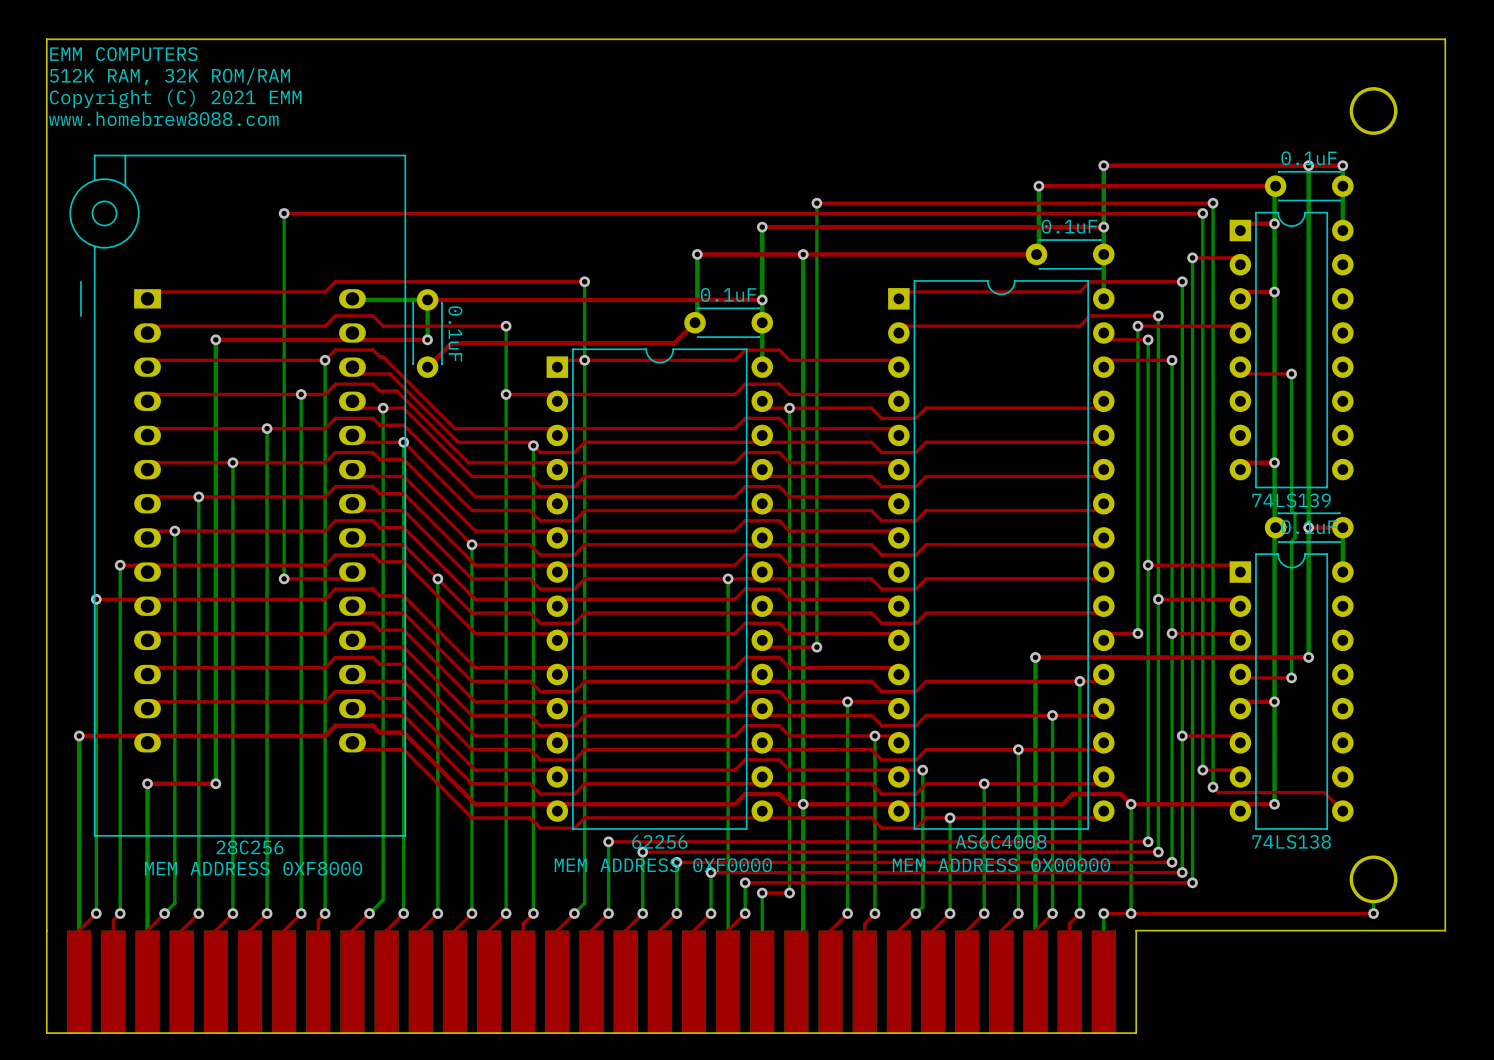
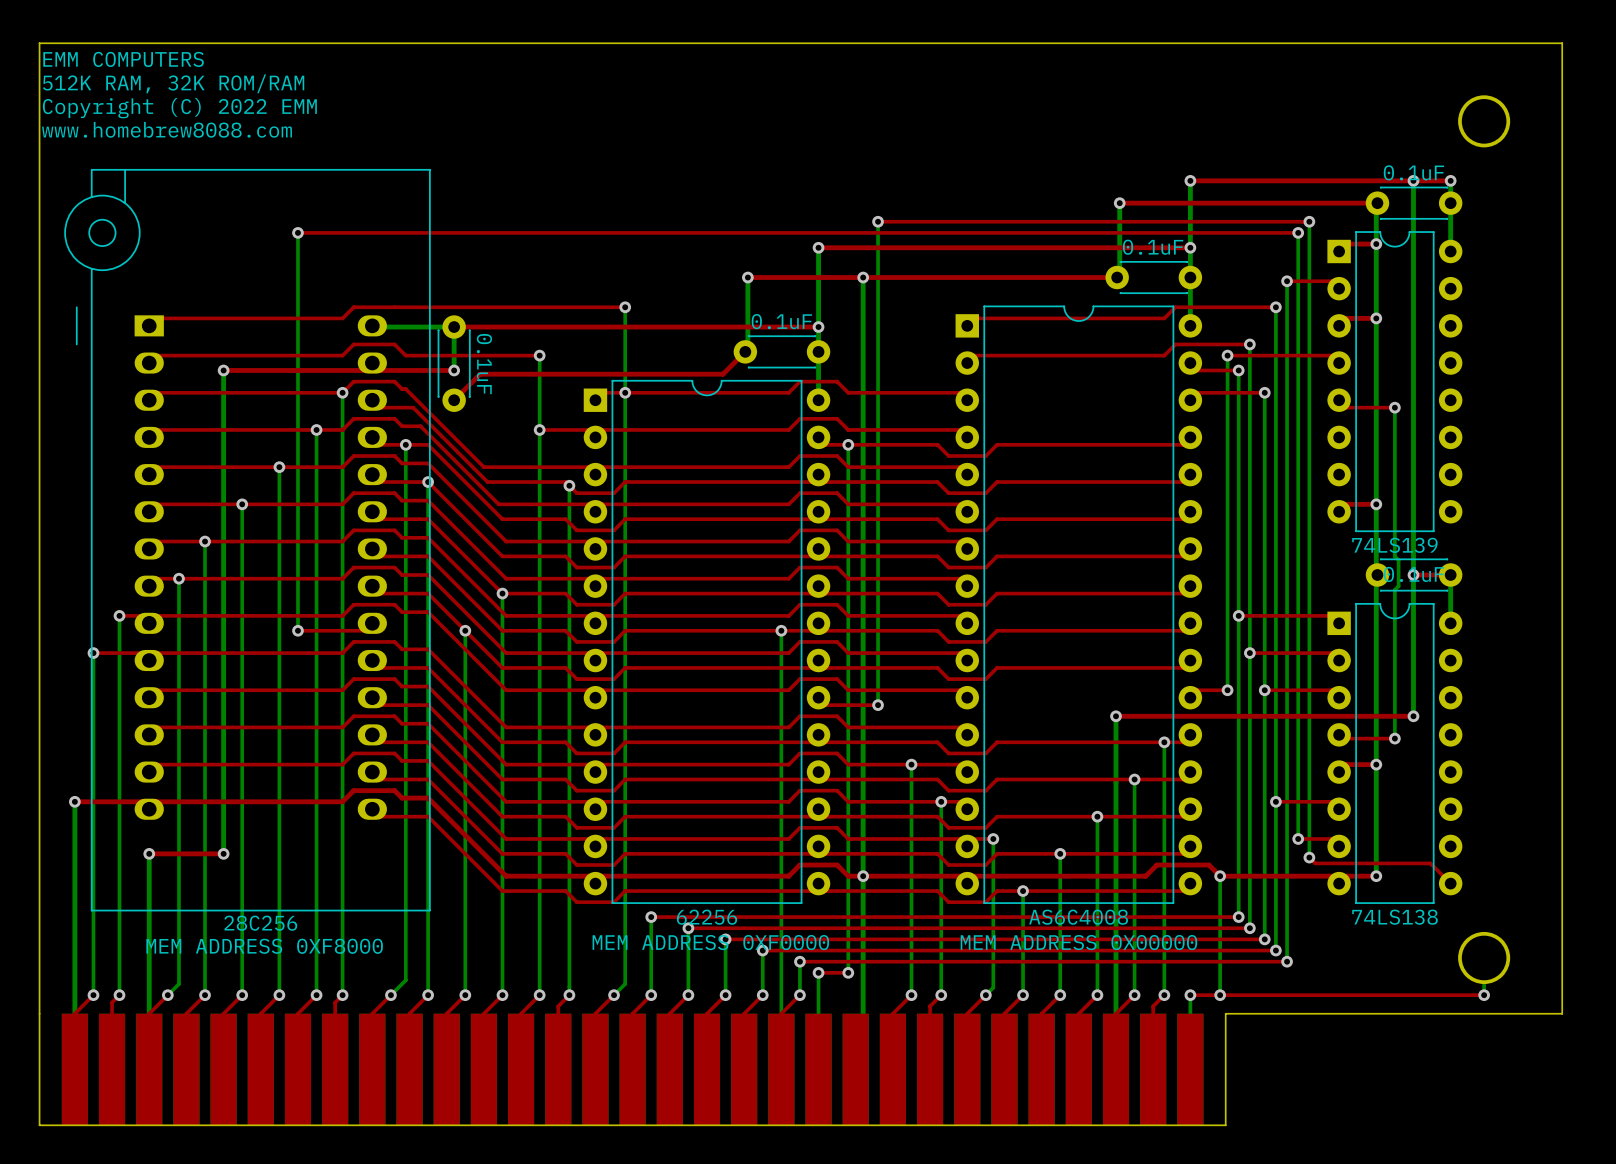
text: Copyright (C) 2021 EMM (175, 98) -> Copyright (C) 2022 EMM (179, 108)

